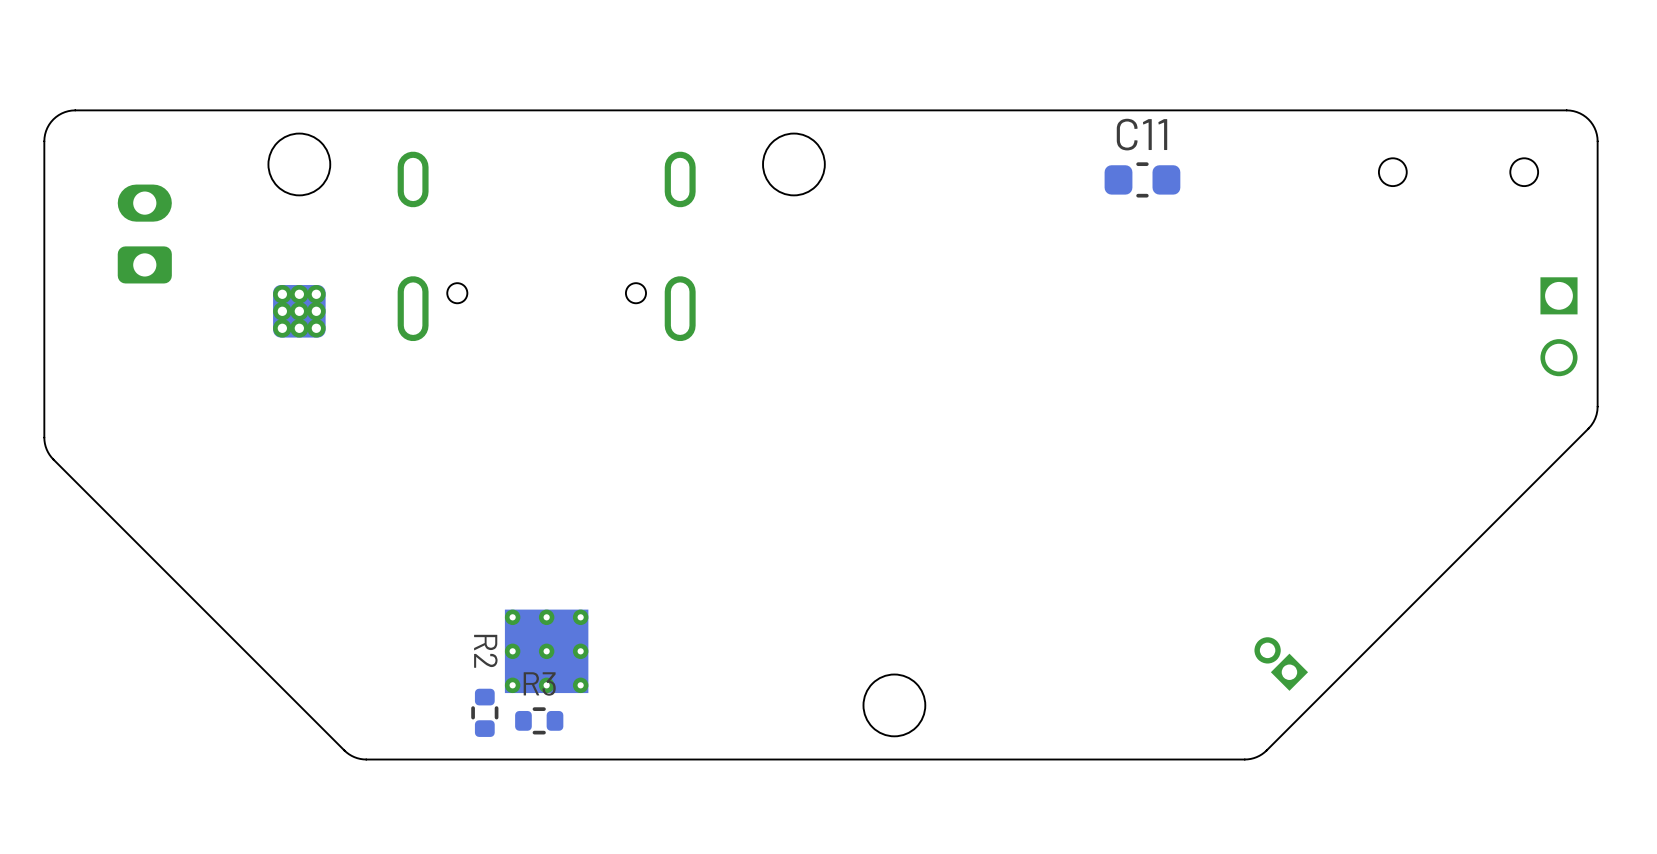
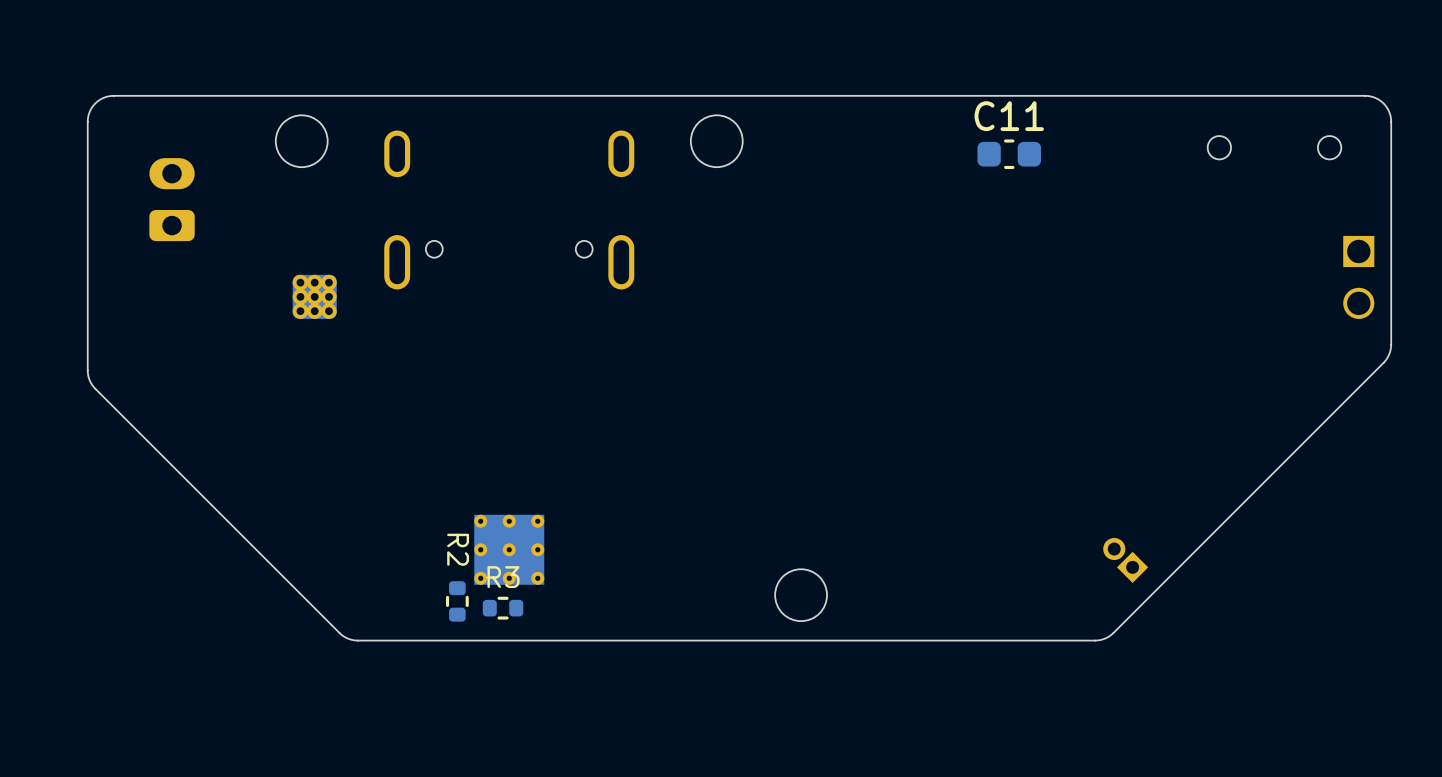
part position: (299, 311) -> (314, 296)

